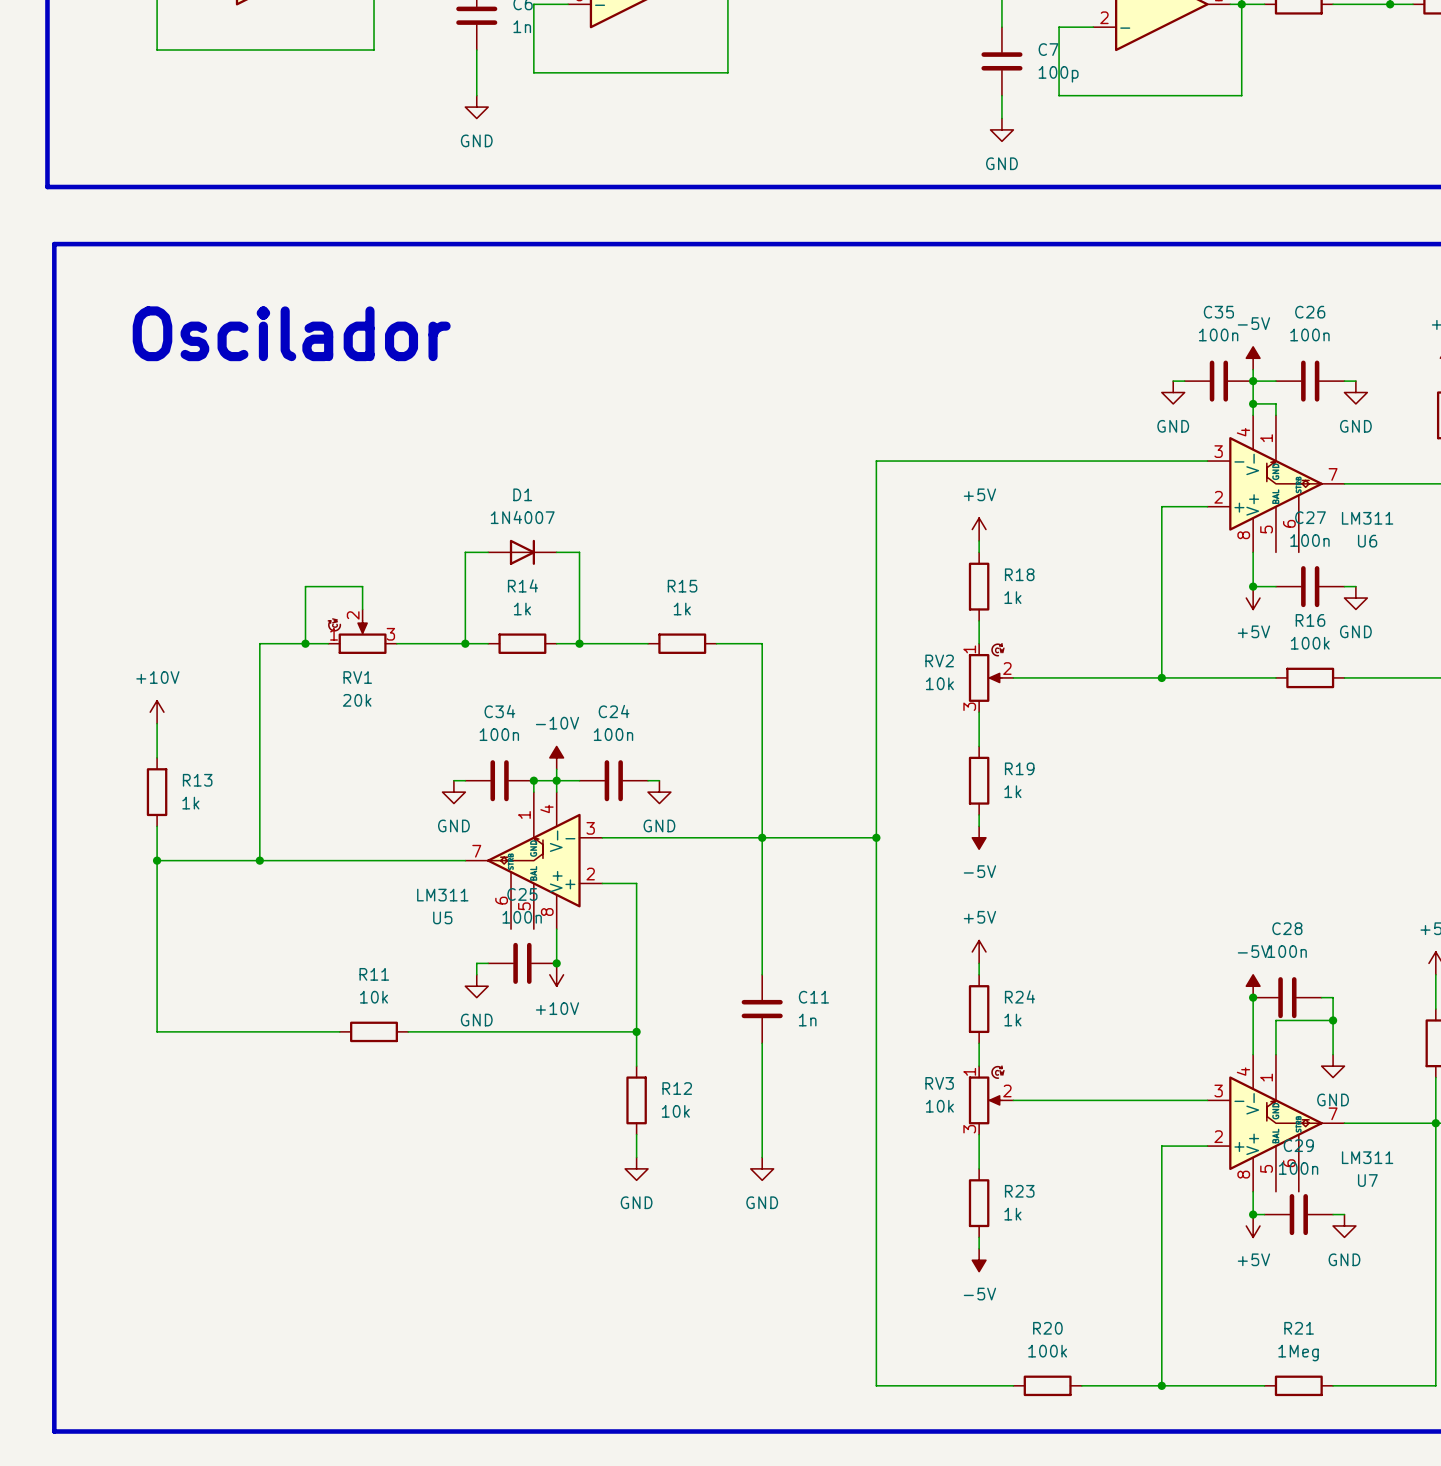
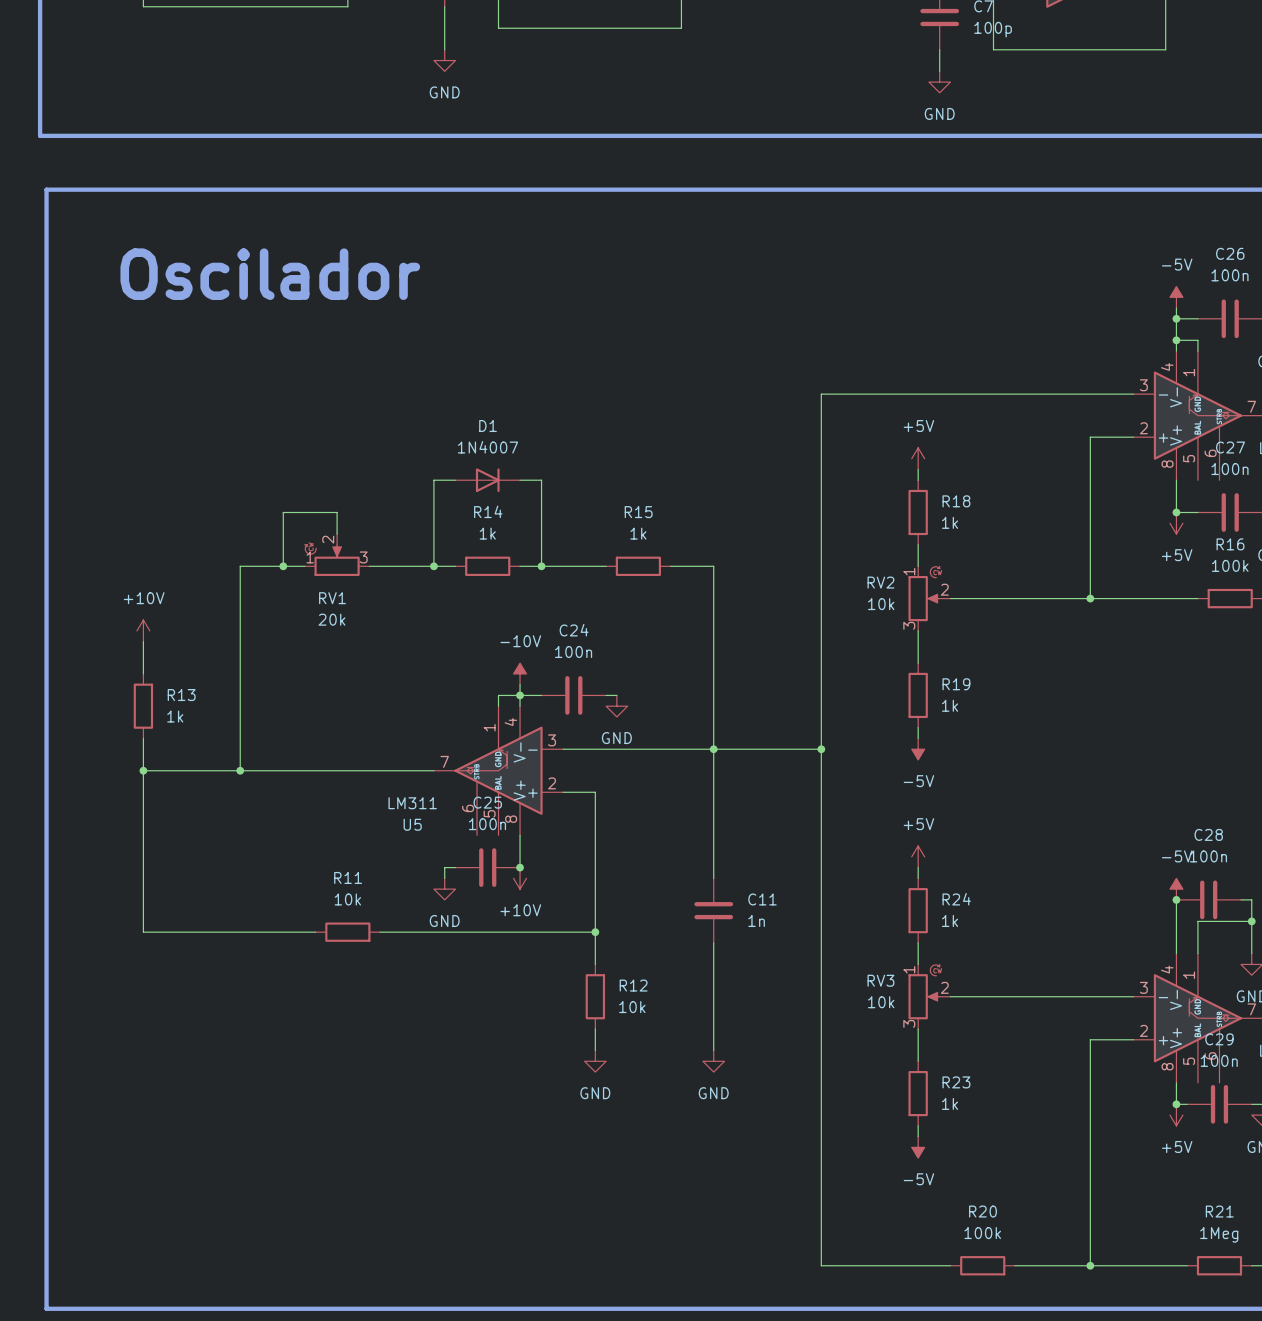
wire: (1173, 381) (1184, 381) -> none
C35: 100n (1218, 381) -> none
power symbol: GND (1173, 392) -> none
wire: (453, 780) (465, 780) -> none
C34: 100n (499, 780) -> none
junction: (533, 780) -> none
power symbol: GND (453, 792) -> none

